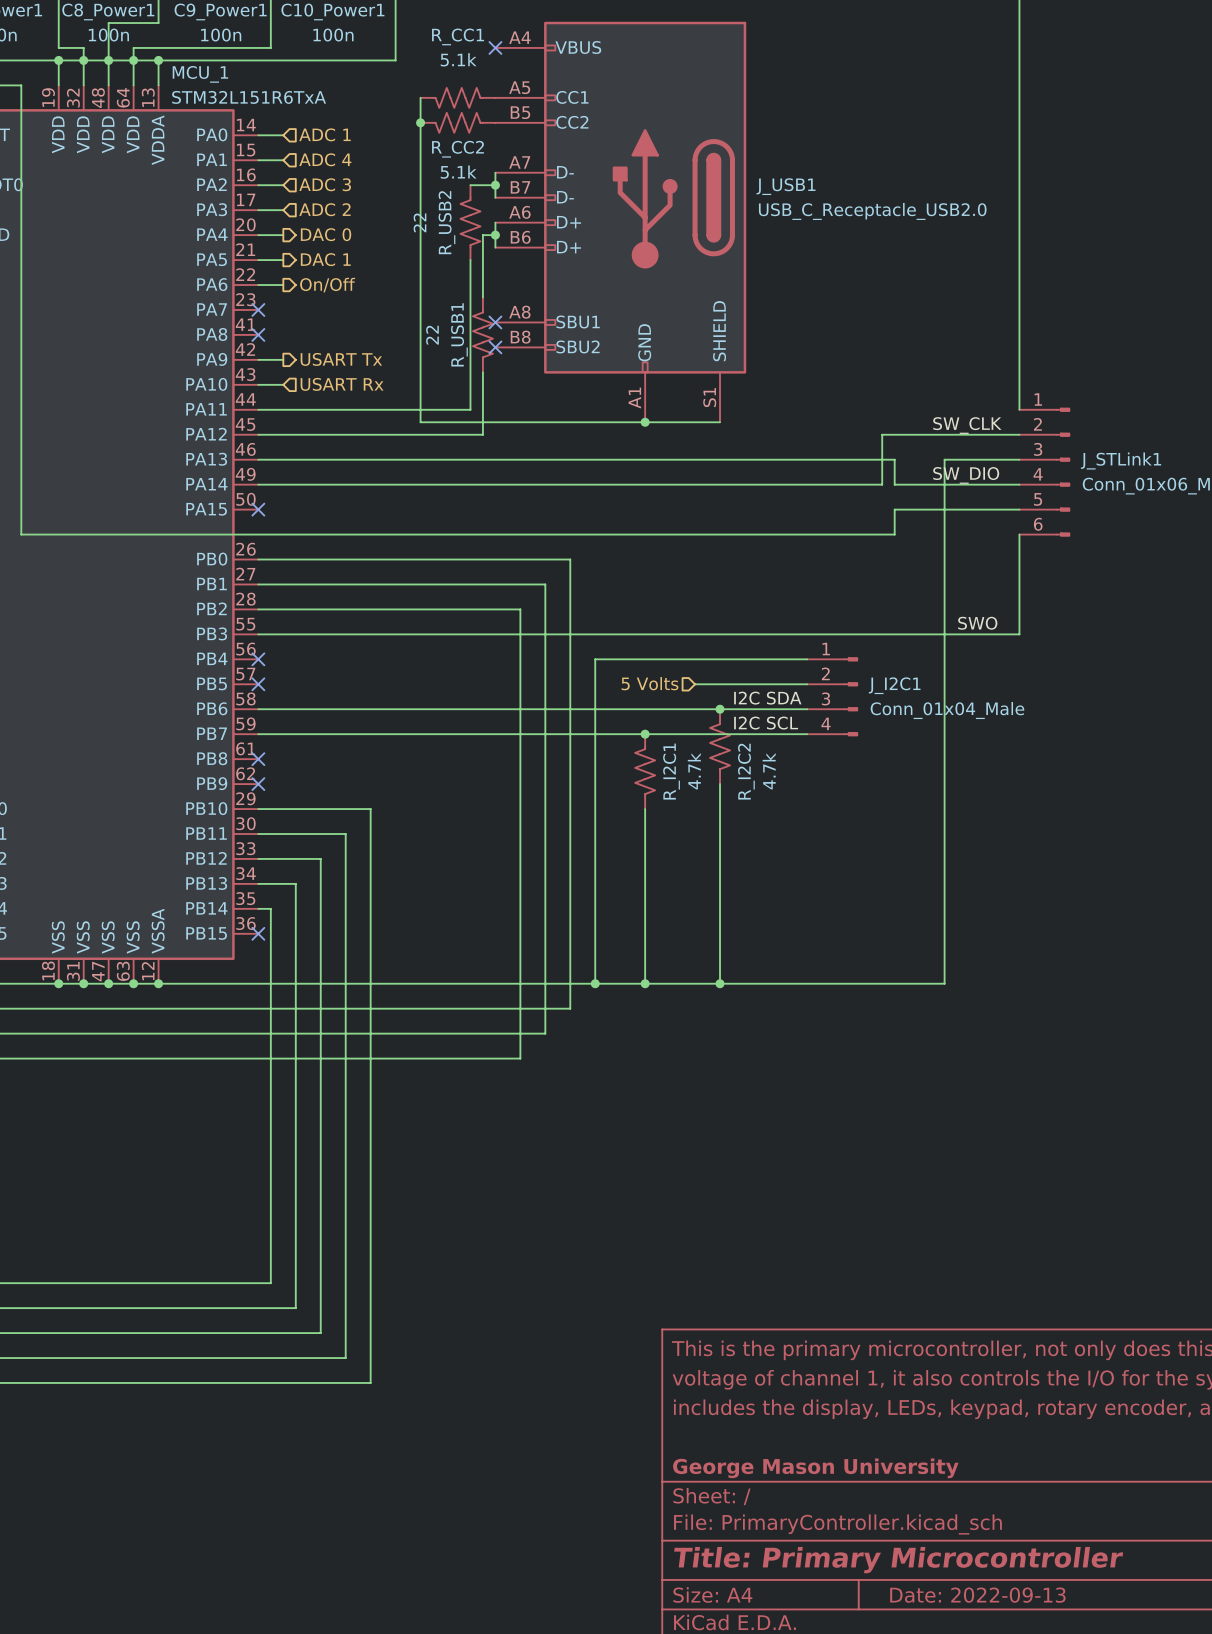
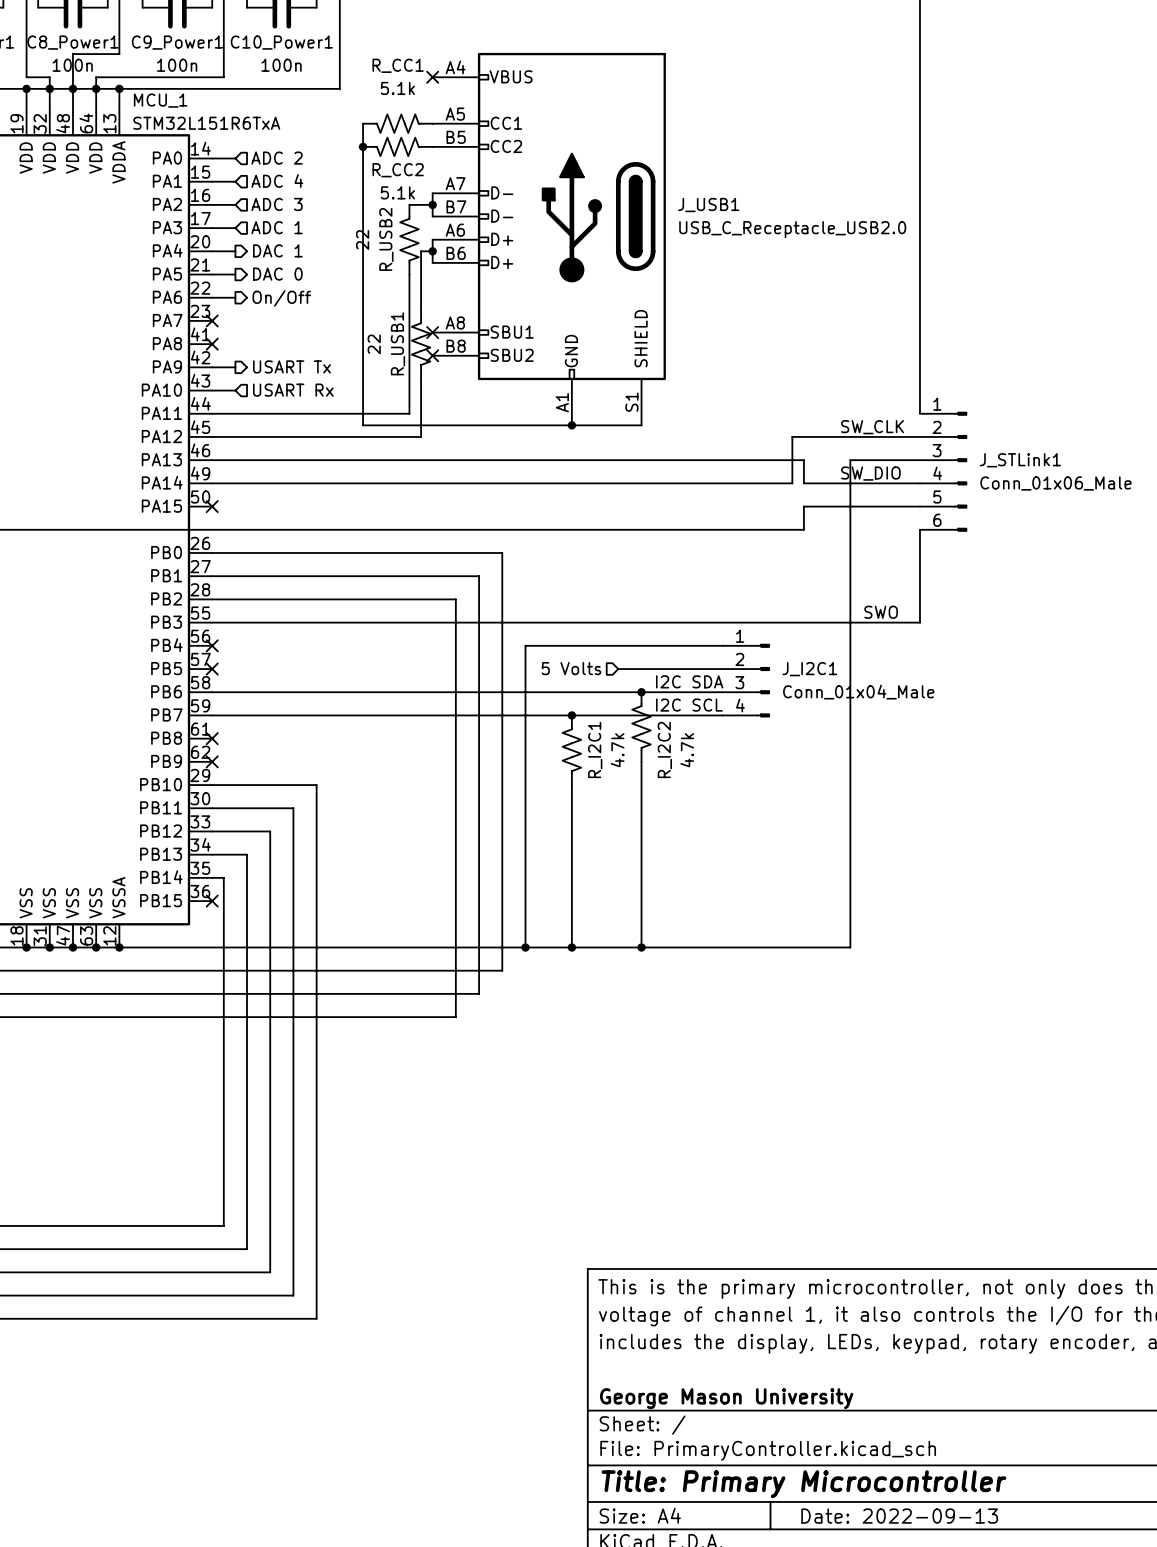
hierarchical label: ADC 1 (325, 134) -> ADC 2 (277, 158)
hierarchical label: ADC 2 (324, 209) -> ADC 1 (277, 227)
hierarchical label: DAC 0 (326, 234) -> DAC 1 (277, 250)
hierarchical label: DAC 1 (325, 259) -> DAC 0 (277, 274)

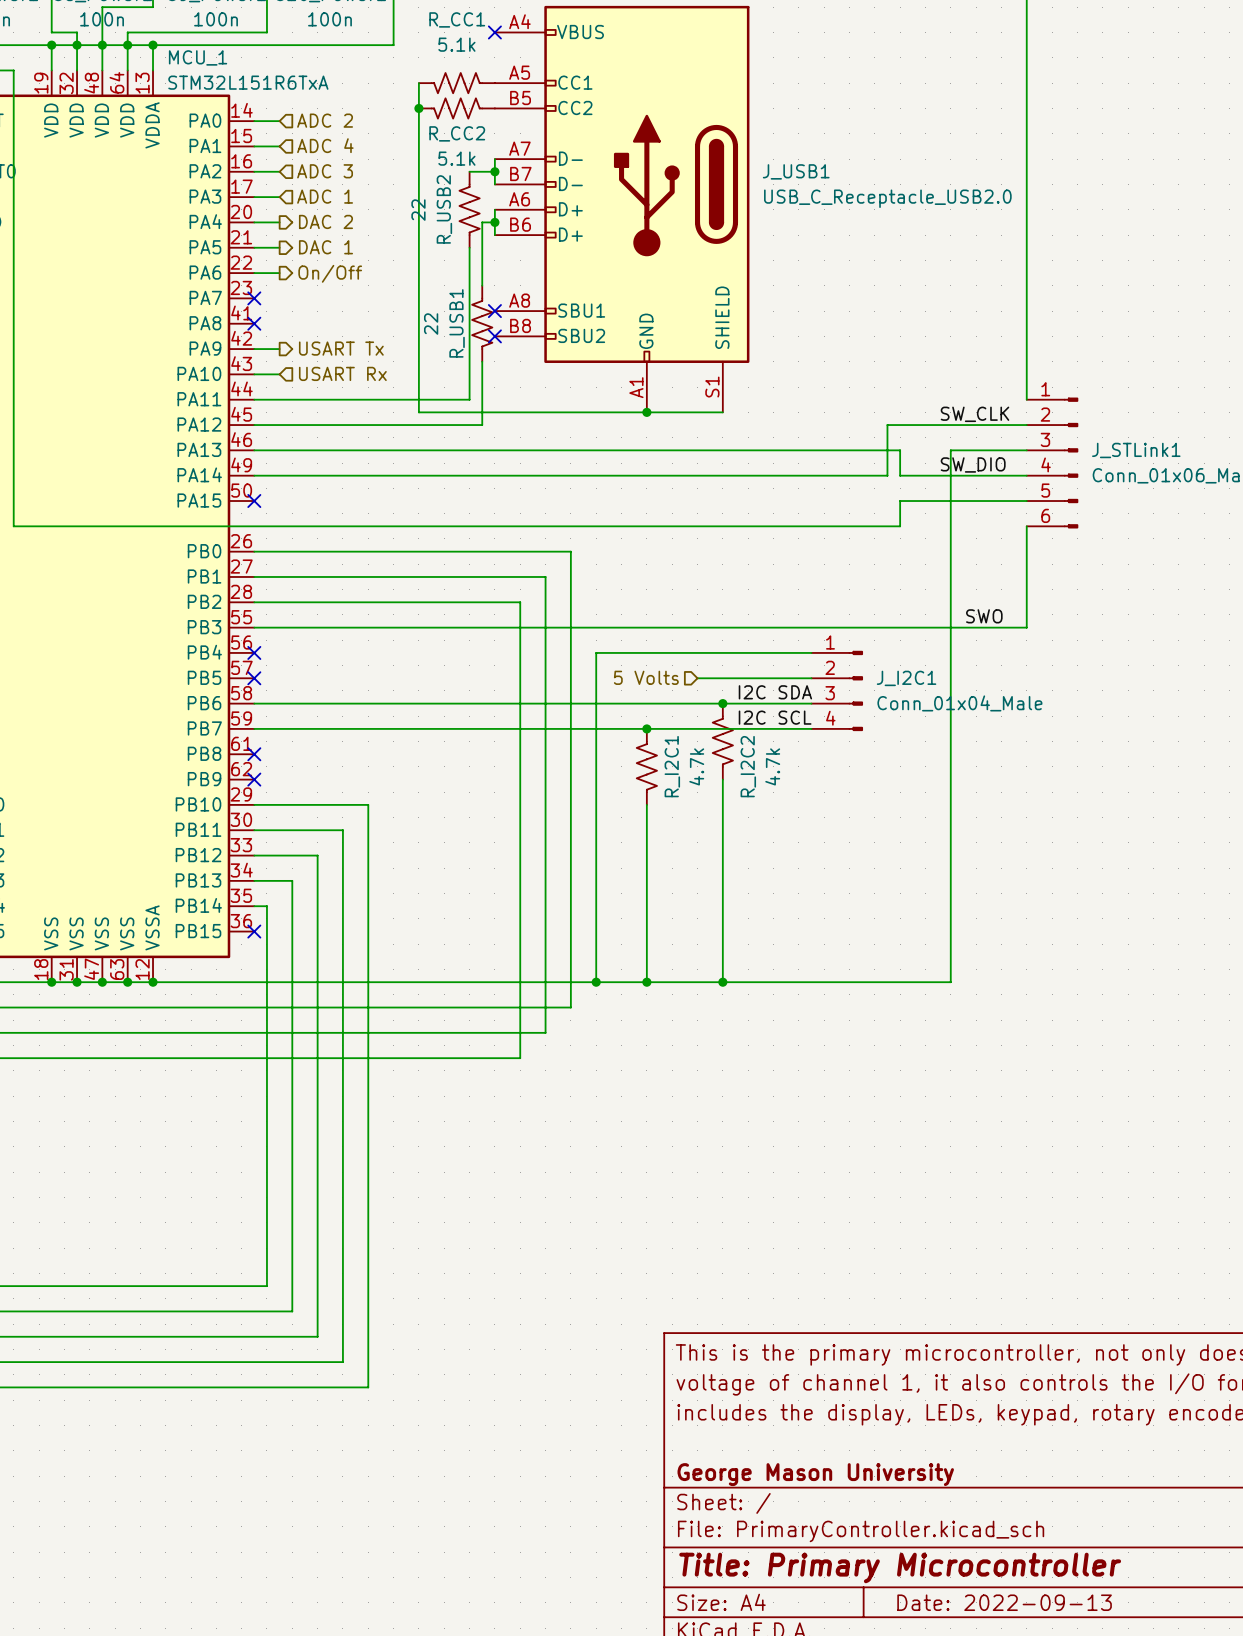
hierarchical label: DAC 1 (277, 250) -> DAC 2 (325, 221)
hierarchical label: DAC 0 (277, 274) -> DAC 1 (325, 247)

